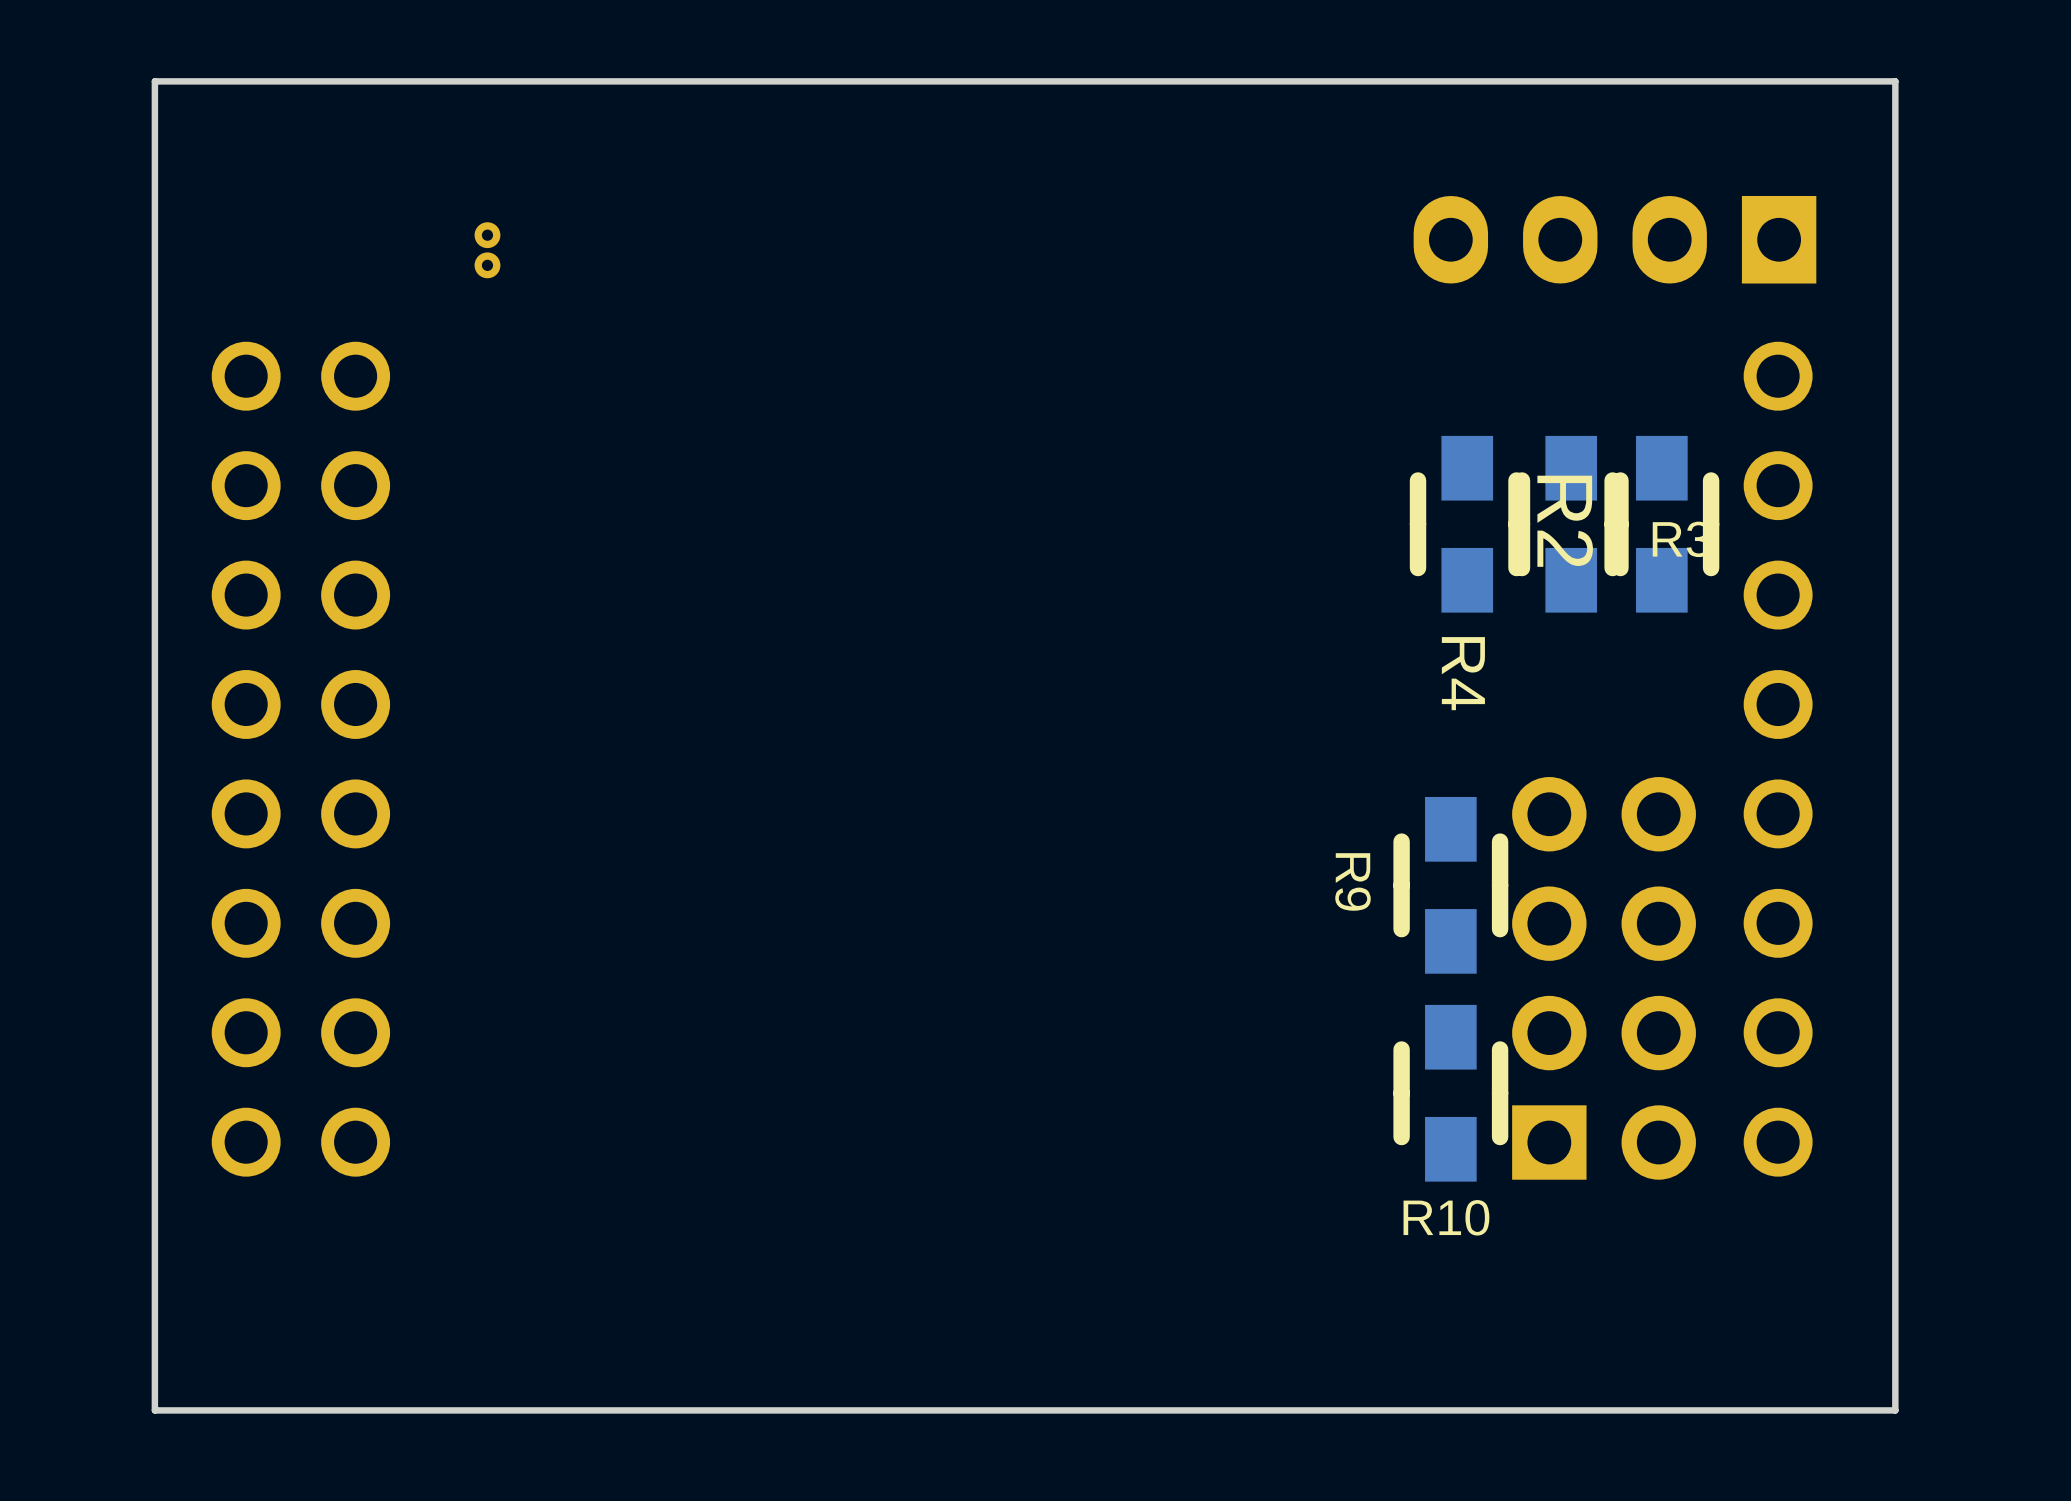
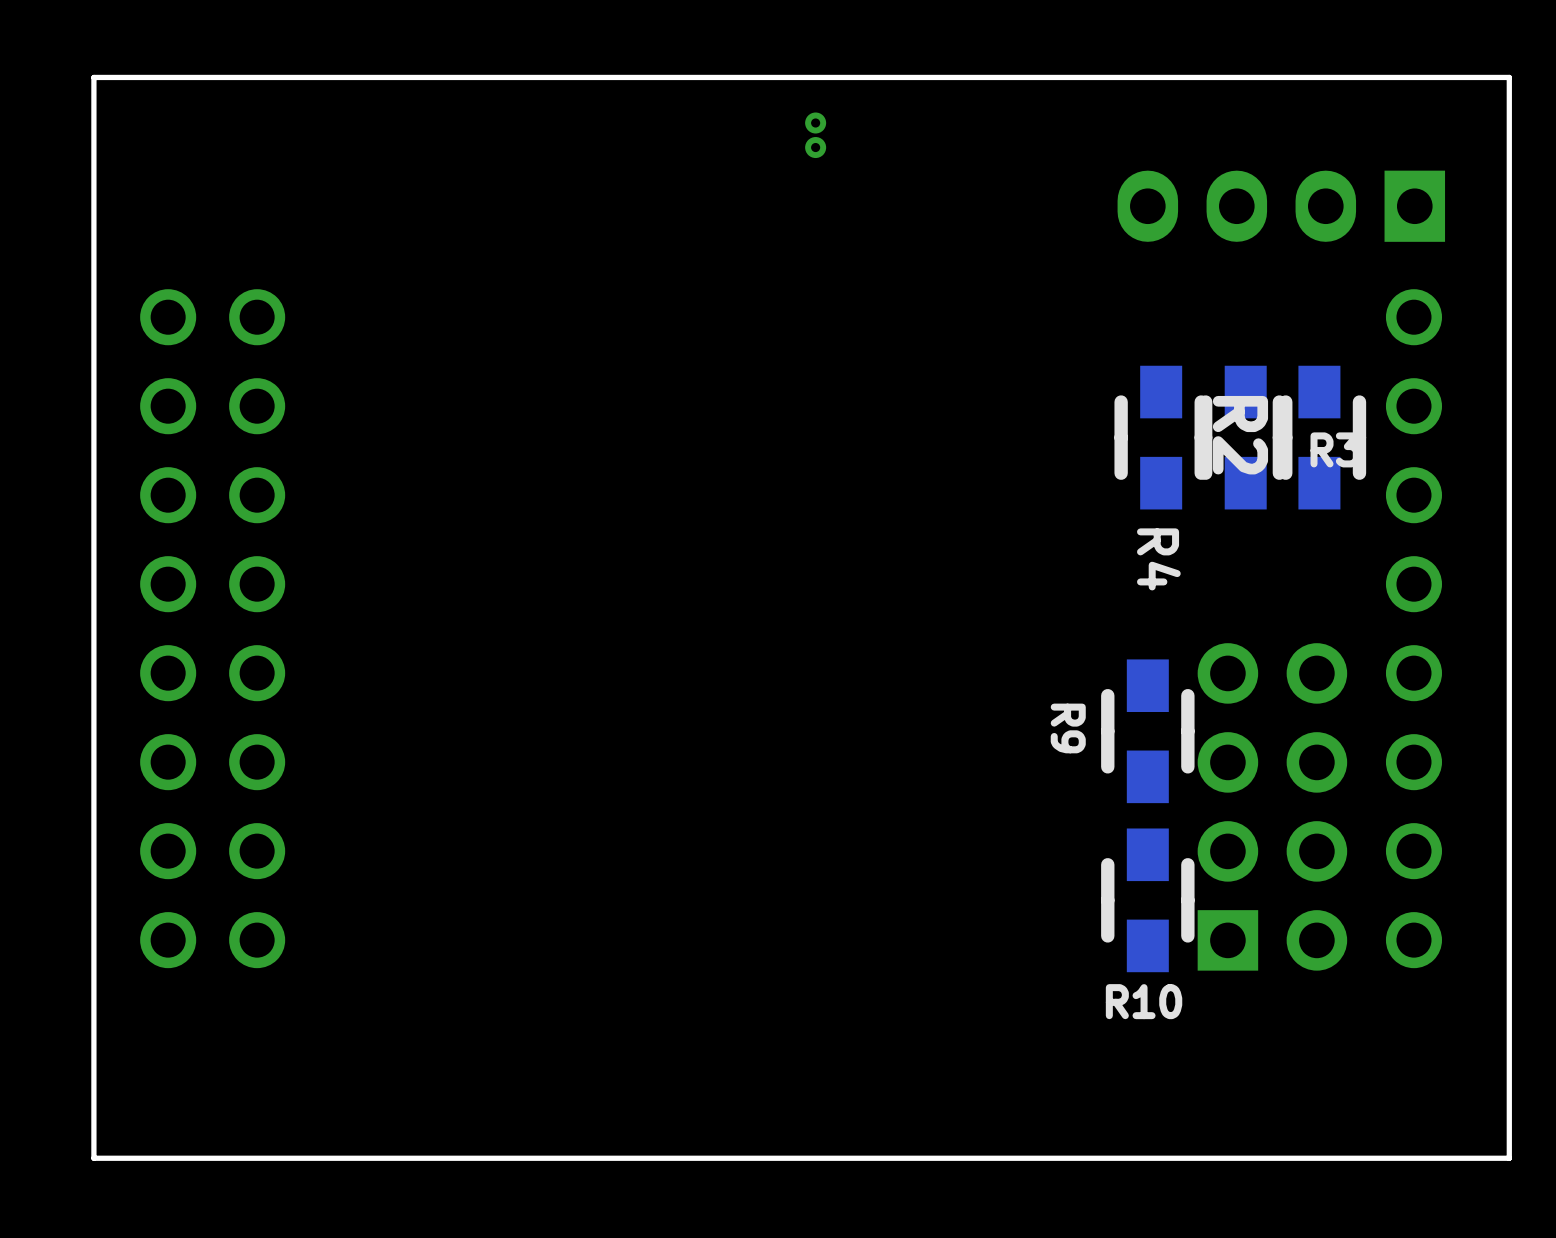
part position: (487, 250) -> (815, 135)

